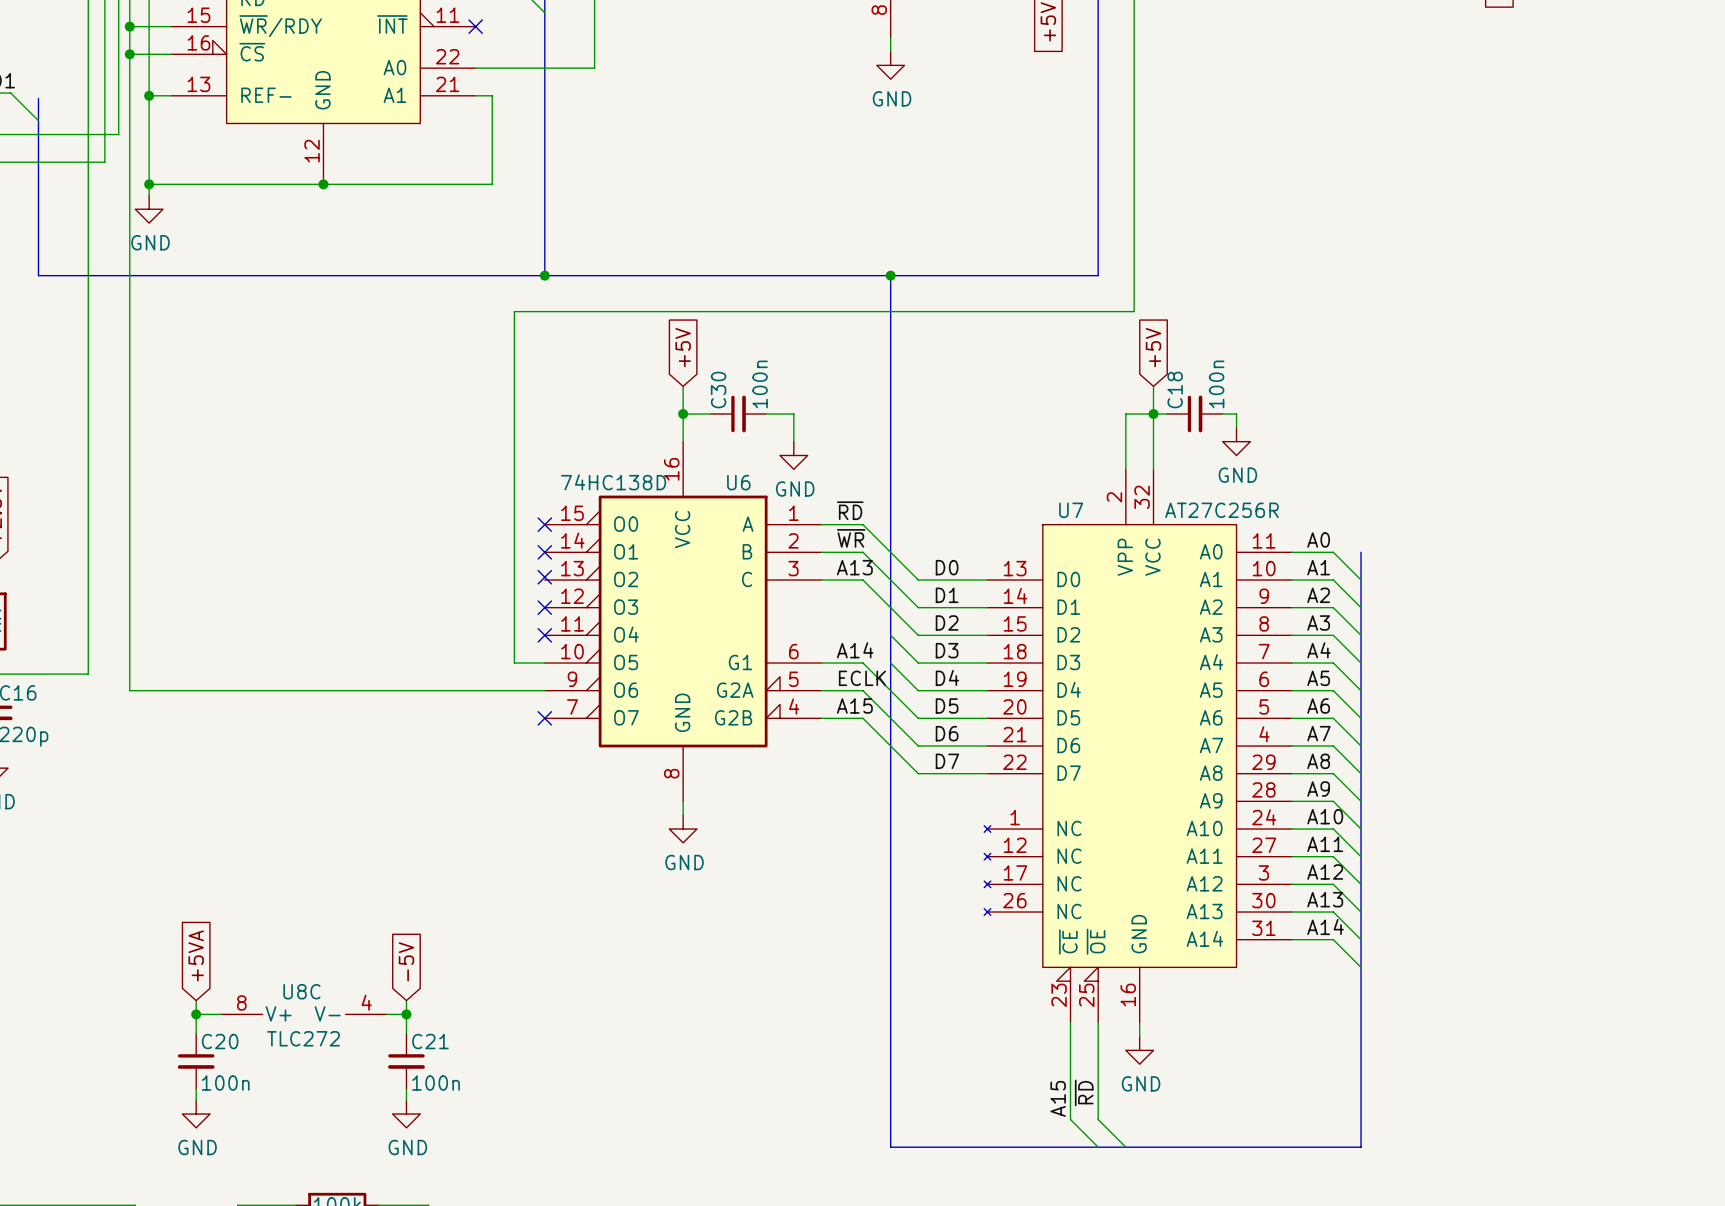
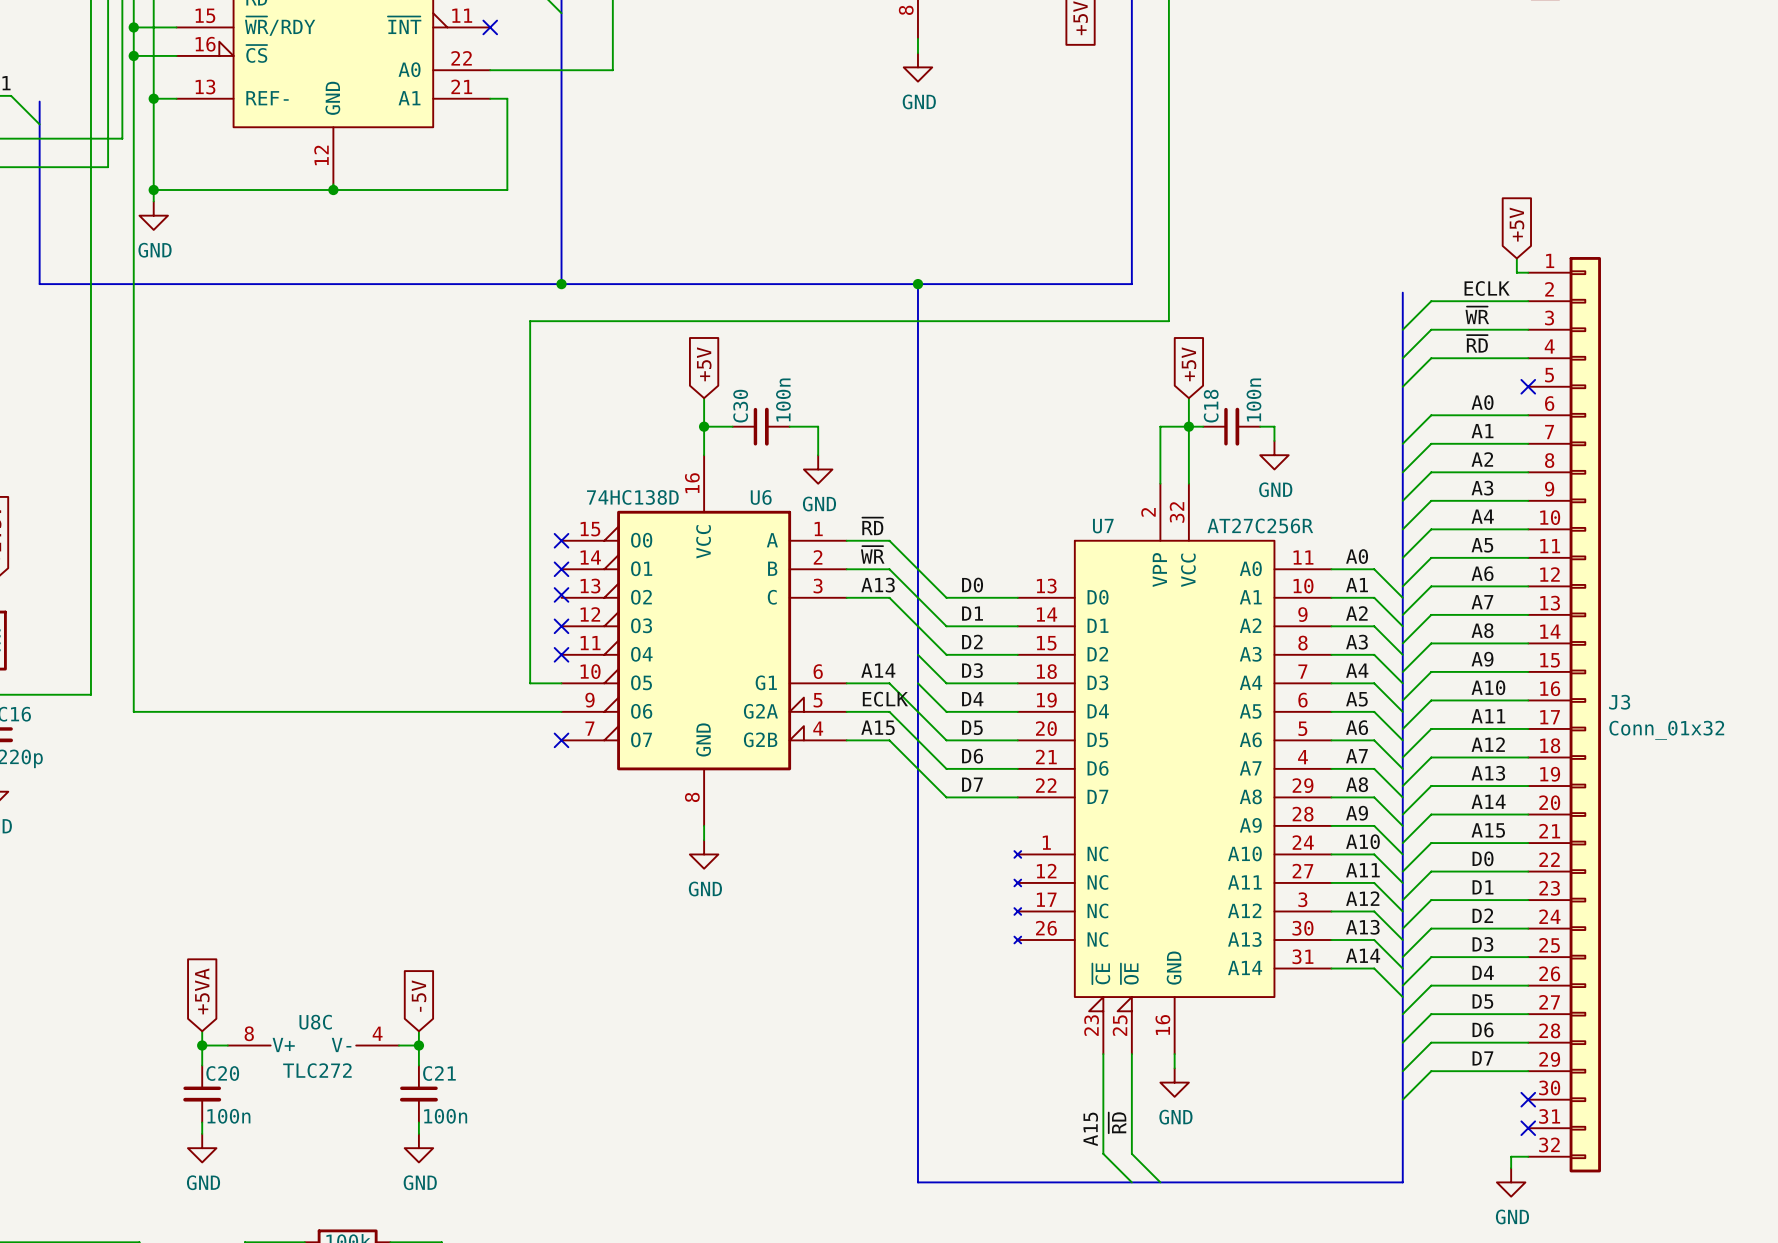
global label: none -> +5V (1516, 224)
wire: none -> (1516, 258) (1516, 272) (1528, 272)
label: none -> ECLK (1487, 288)
bus: none -> (1402, 292) (1402, 569)
wire: none -> (1528, 301) (1431, 301) (1402, 329)
label: none -> ~{WR} (1477, 315)
wire: none -> (1528, 329) (1431, 329) (1402, 358)
label: none -> ~{RD} (1477, 343)
wire: none -> (1528, 358) (1431, 358) (1402, 386)
no-connect mark: none -> (1528, 386)
label: none -> A0 (1482, 402)
wire: none -> (1528, 415) (1431, 415) (1402, 443)
label: none -> A1 (1482, 431)
wire: none -> (1528, 443) (1431, 443) (1402, 472)
label: none -> A2 (1482, 459)
wire: none -> (1528, 472) (1431, 472) (1402, 500)
label: none -> A3 (1482, 488)
wire: none -> (1528, 500) (1431, 500) (1402, 529)
label: none -> A4 (1482, 516)
wire: none -> (1528, 529) (1431, 529) (1402, 557)
label: none -> A5 (1482, 545)
wire: none -> (1528, 557) (1431, 557) (1402, 586)
label: none -> A6 (1482, 573)
wire: none -> (1528, 586) (1431, 586) (1402, 614)
label: none -> A7 (1482, 602)
wire: none -> (1528, 614) (1431, 614) (1402, 643)
label: none -> A8 (1482, 630)
wire: none -> (1528, 643) (1431, 643) (1402, 671)
label: none -> A9 (1482, 659)
wire: none -> (1528, 671) (1431, 671) (1402, 700)
label: none -> A10 (1488, 687)
wire: none -> (1528, 700) (1431, 700) (1402, 728)
J3: none -> Conn_01x32 (1564, 714)
label: none -> A11 (1488, 716)
wire: none -> (1528, 728) (1431, 728) (1402, 757)
label: none -> A12 (1488, 744)
wire: none -> (1528, 757) (1431, 757) (1402, 786)
label: none -> A13 (1488, 773)
wire: none -> (1528, 786) (1431, 786) (1402, 814)
label: none -> A14 (1488, 801)
wire: none -> (1528, 814) (1431, 814) (1402, 843)
label: none -> A15 (1488, 830)
wire: none -> (1528, 843) (1431, 843) (1402, 871)
label: none -> D0 (1483, 858)
wire: none -> (1528, 871) (1431, 871) (1402, 900)
label: none -> D1 (1482, 887)
wire: none -> (1528, 900) (1431, 900) (1402, 928)
label: none -> D2 (1482, 915)
wire: none -> (1528, 928) (1431, 928) (1402, 957)
label: none -> D3 (1482, 944)
wire: none -> (1528, 957) (1431, 957) (1402, 985)
label: none -> D4 (1483, 972)
wire: none -> (1528, 985) (1431, 985) (1402, 1014)
label: none -> D5 (1482, 1001)
wire: none -> (1528, 1014) (1431, 1014) (1402, 1042)
label: none -> D6 (1483, 1029)
wire: none -> (1528, 1042) (1431, 1042) (1402, 1071)
label: none -> D7 (1482, 1058)
wire: none -> (1528, 1071) (1431, 1071) (1402, 1099)
no-connect mark: none -> (1528, 1099)
no-connect mark: none -> (1528, 1128)
wire: none -> (1528, 1156) (1511, 1156) (1511, 1168)
power symbol: none -> GND (1511, 1182)

